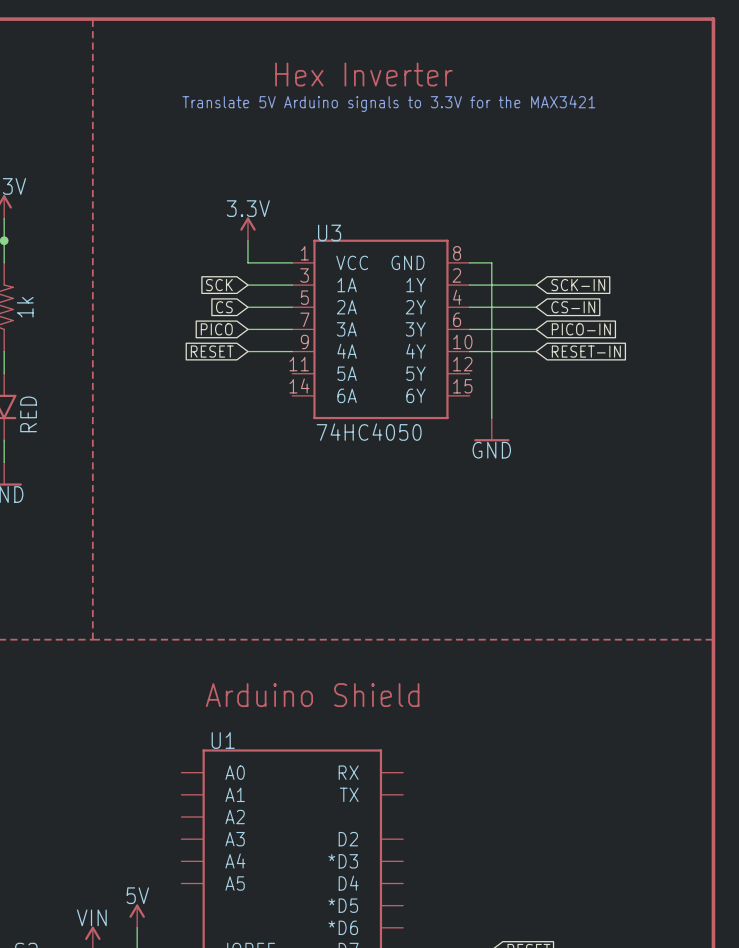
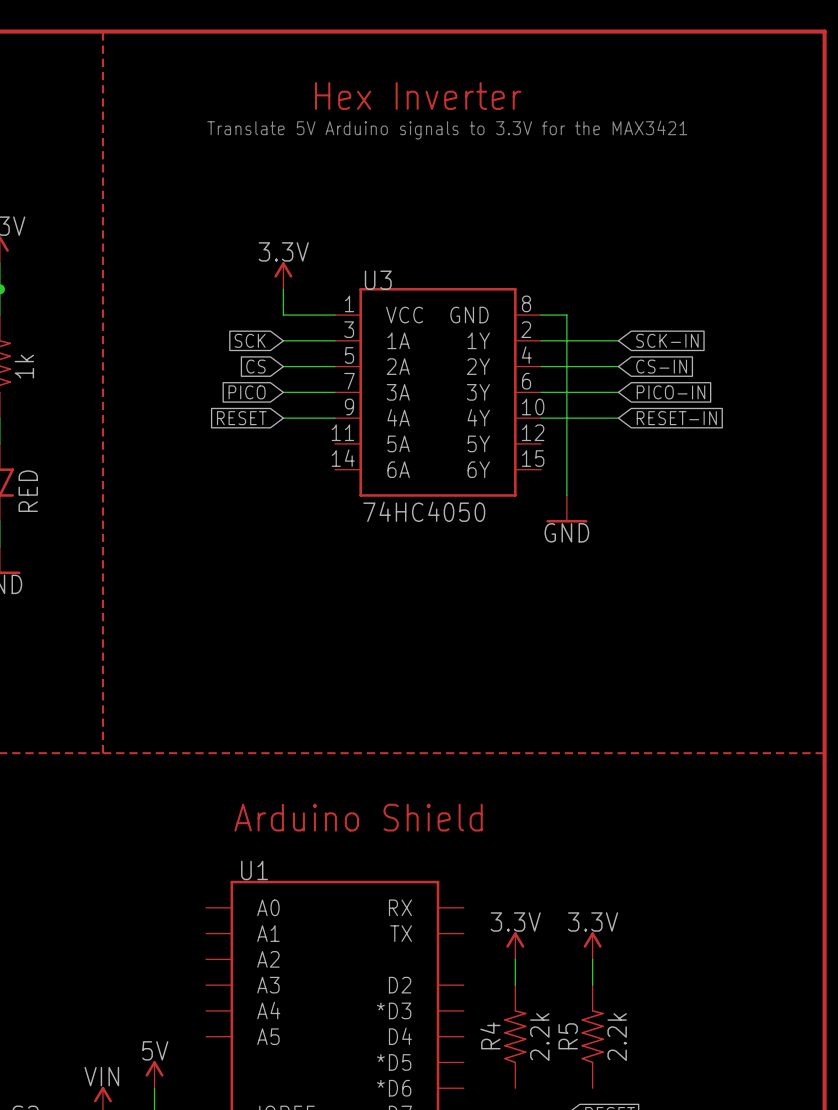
power symbol: none -> 3.3V (515, 945)
power symbol: none -> 3.3V (592, 945)
wire: none -> (515, 959) (515, 985)
wire: none -> (592, 959) (592, 985)
R4: none -> 2.2k (515, 1036)
R5: none -> 2.2k (592, 1036)

